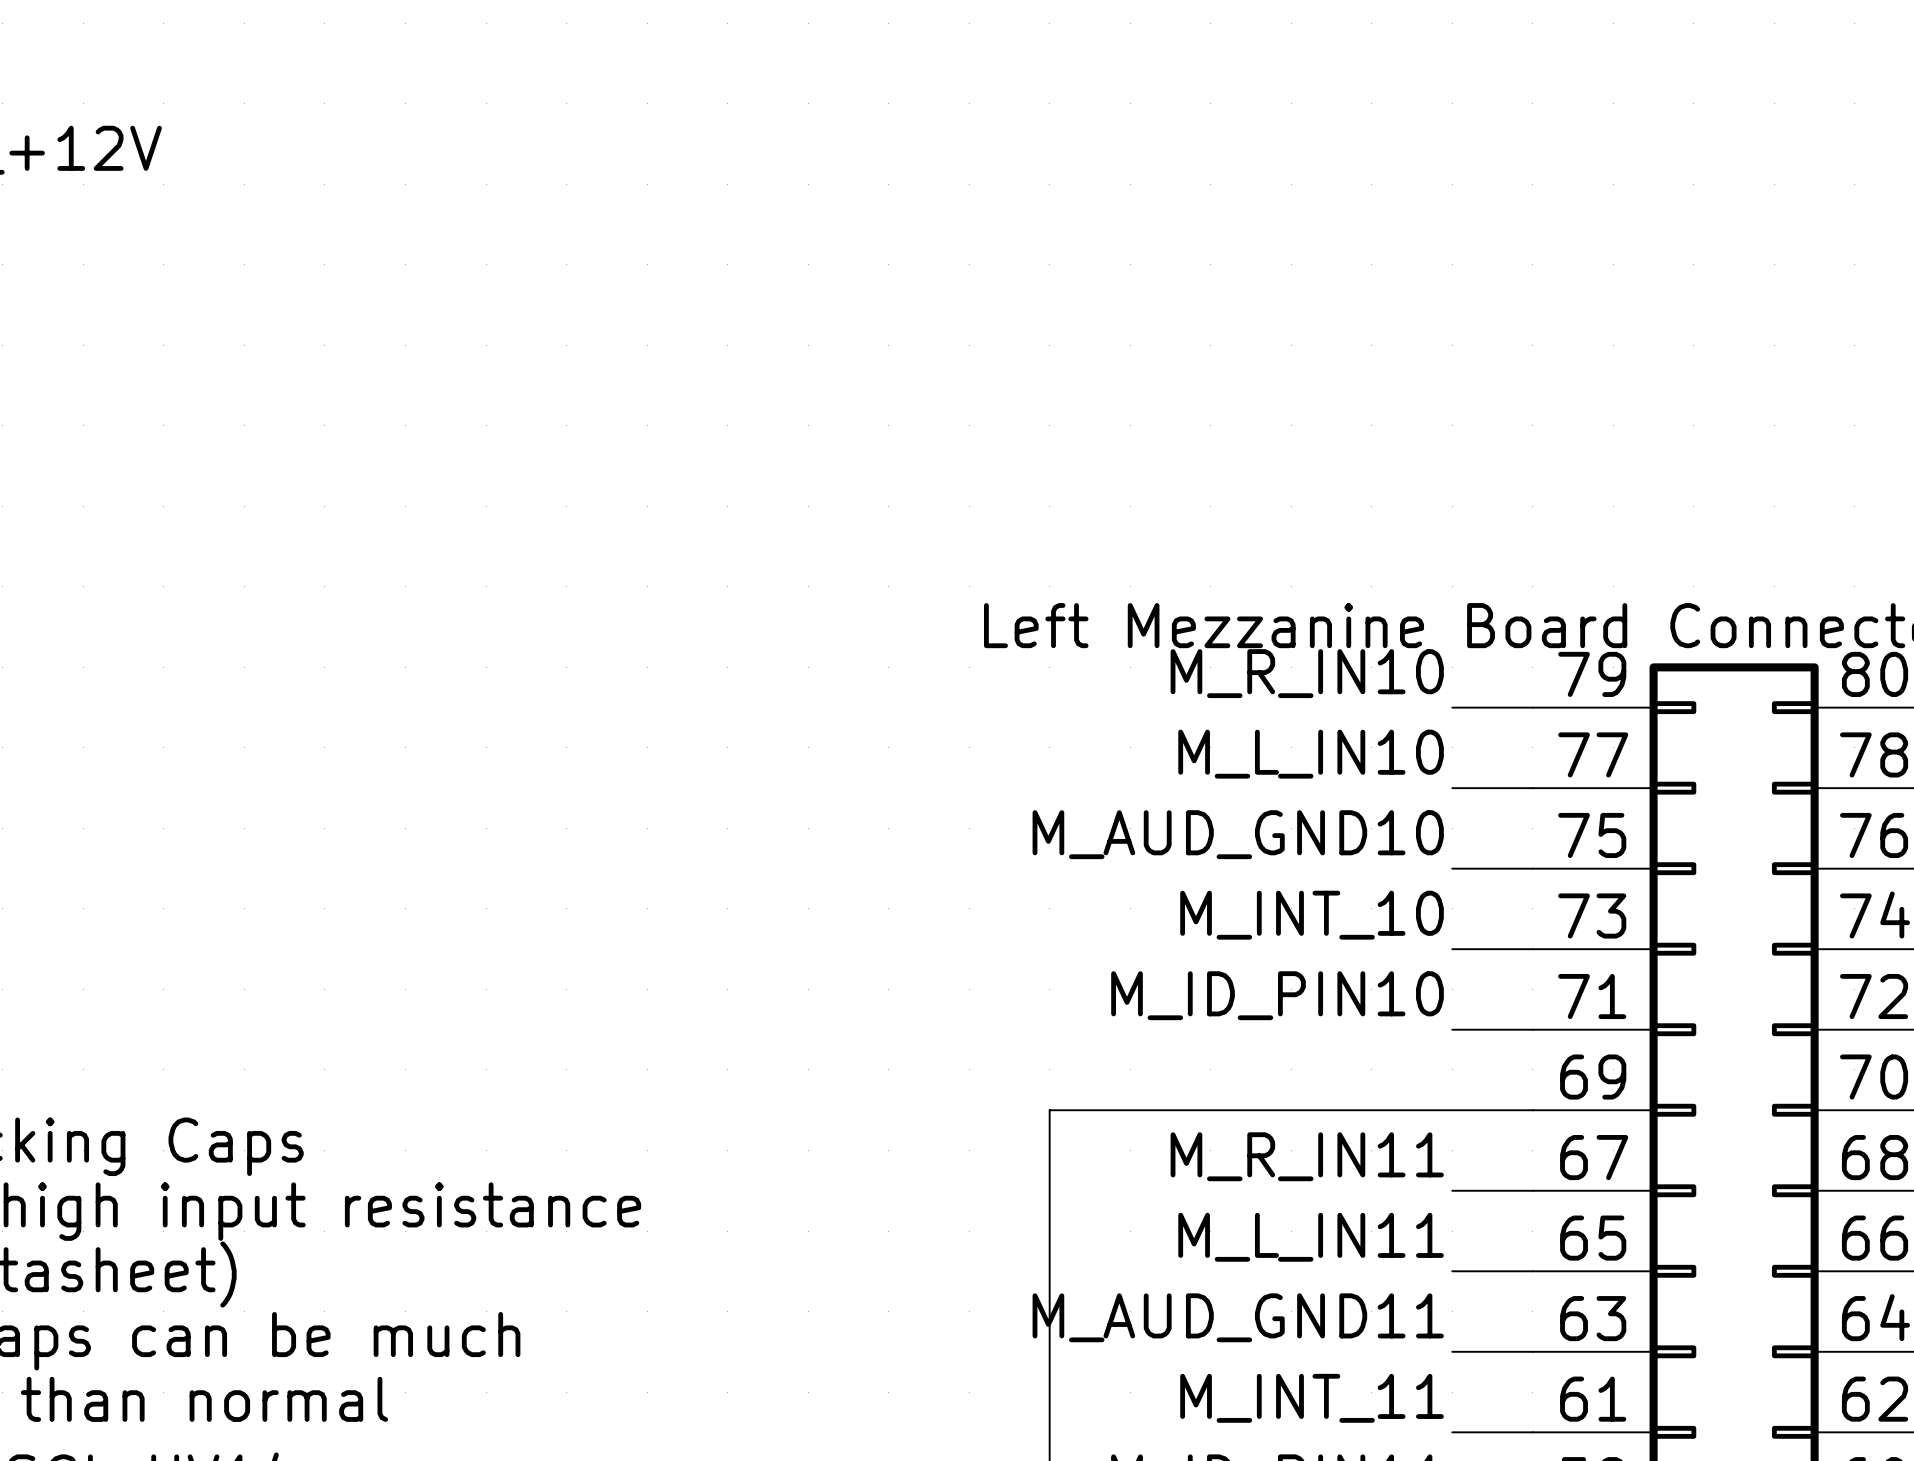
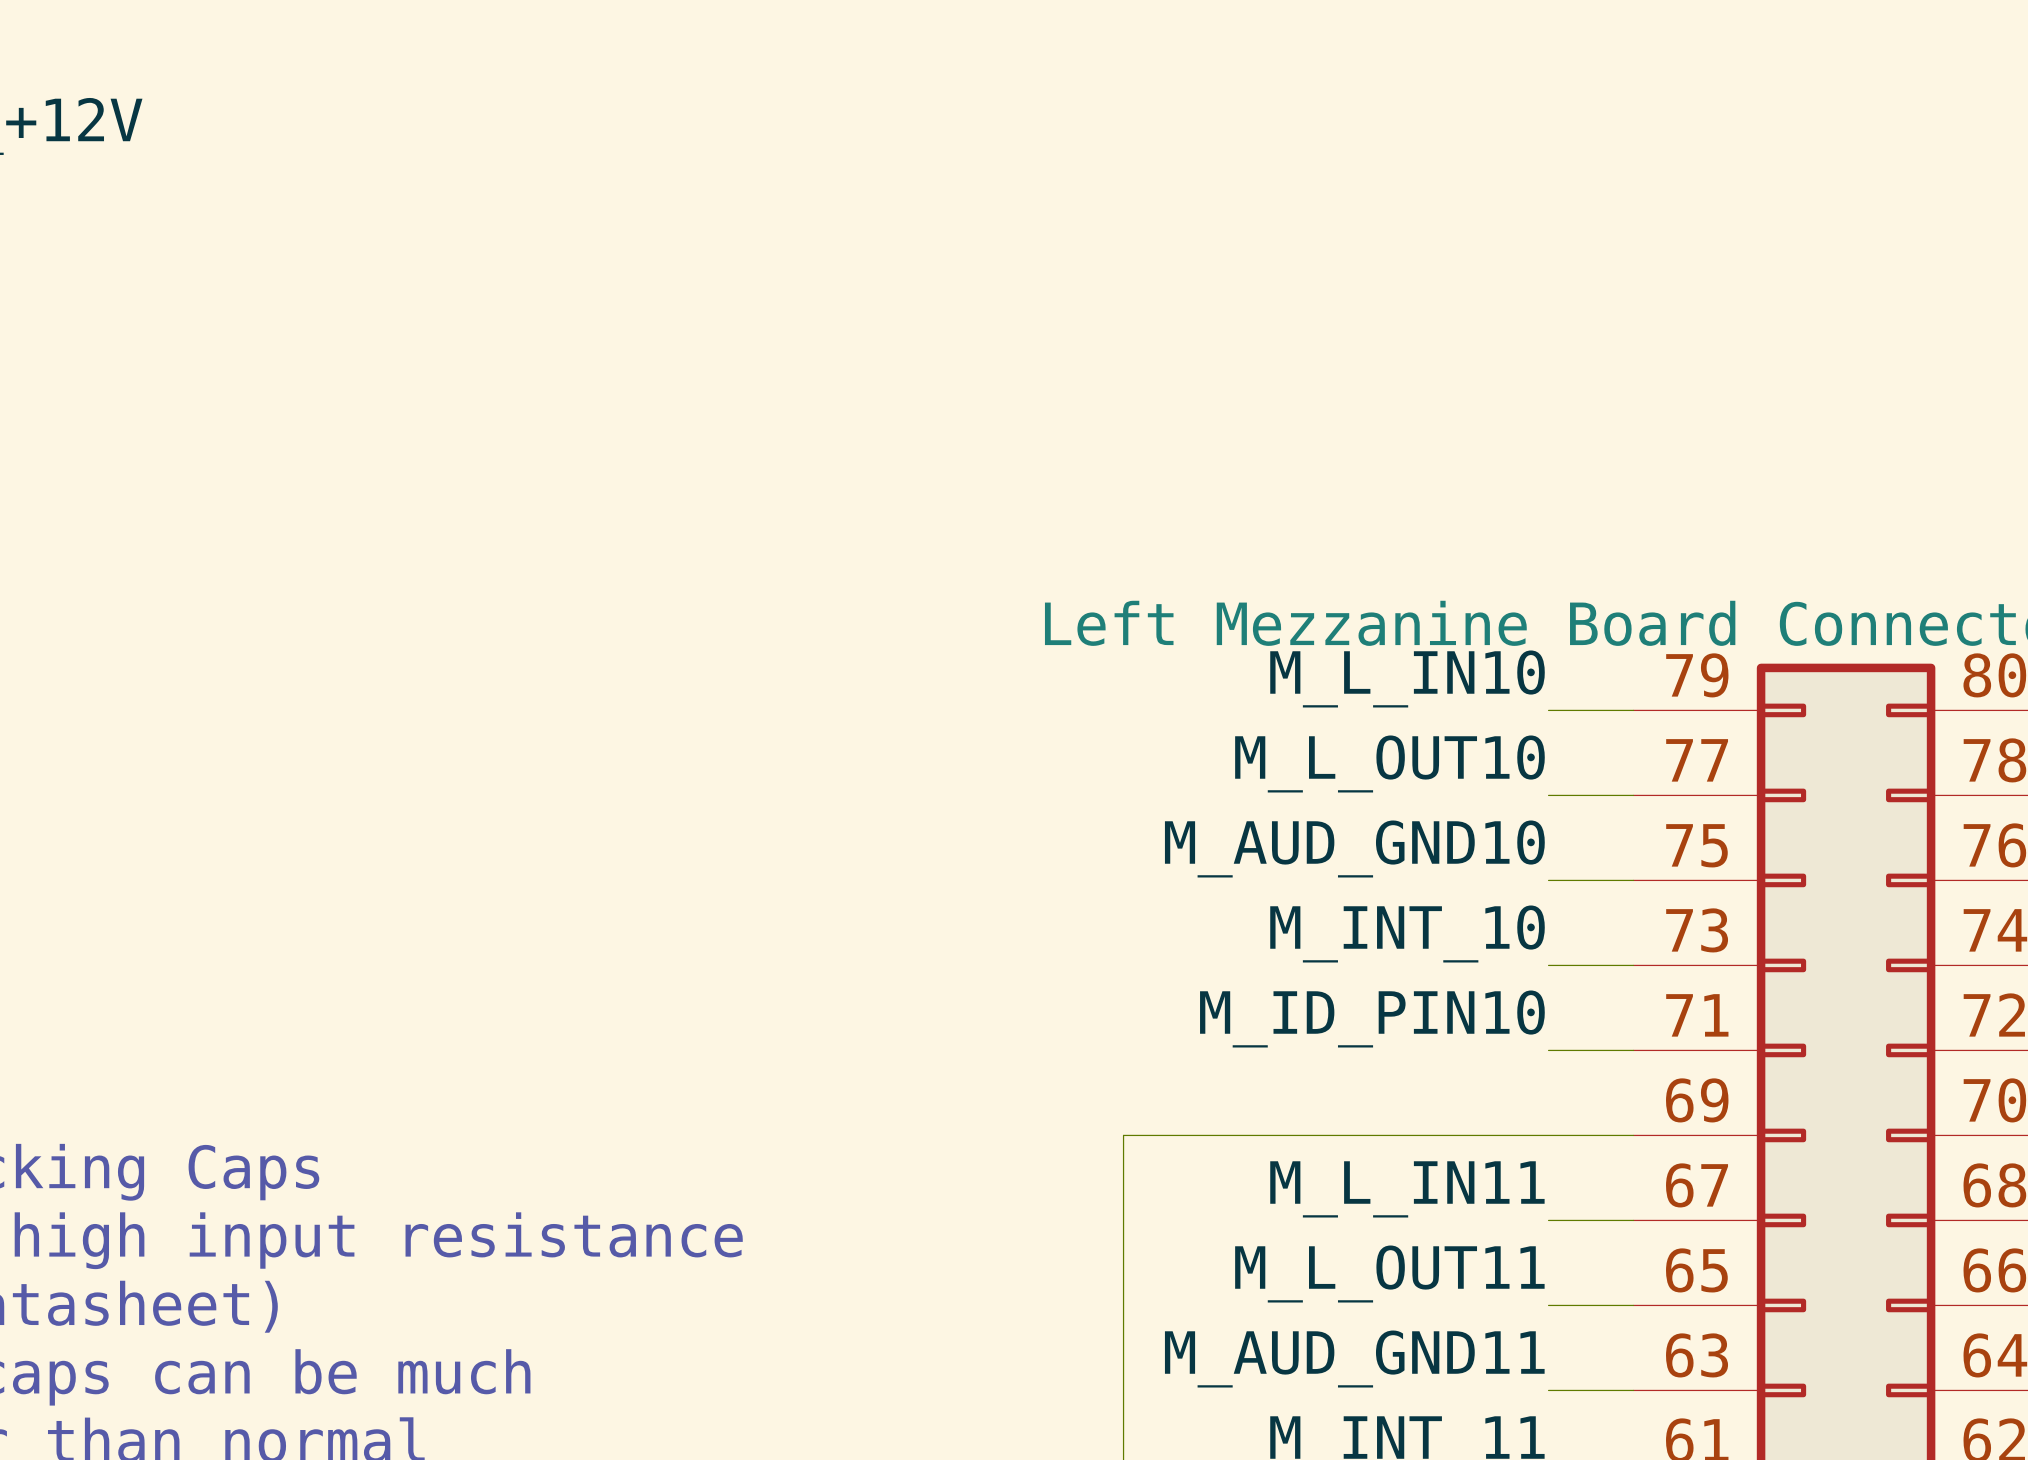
label: M_R_IN10 (1307, 673) -> M_L_IN10 (1407, 678)
label: M_L_IN10 (1311, 754) -> M_L_OUT10 (1389, 763)
label: M_R_IN11 (1307, 1156) -> M_L_IN11 (1407, 1189)
label: M_L_IN11 (1311, 1237) -> M_L_OUT11 (1389, 1274)

